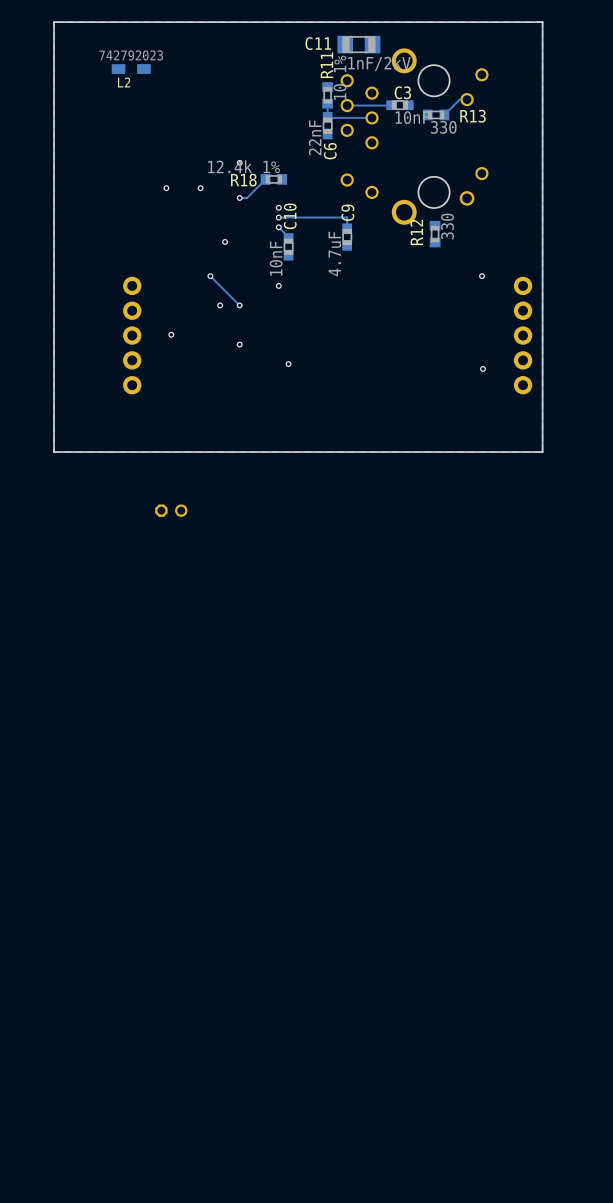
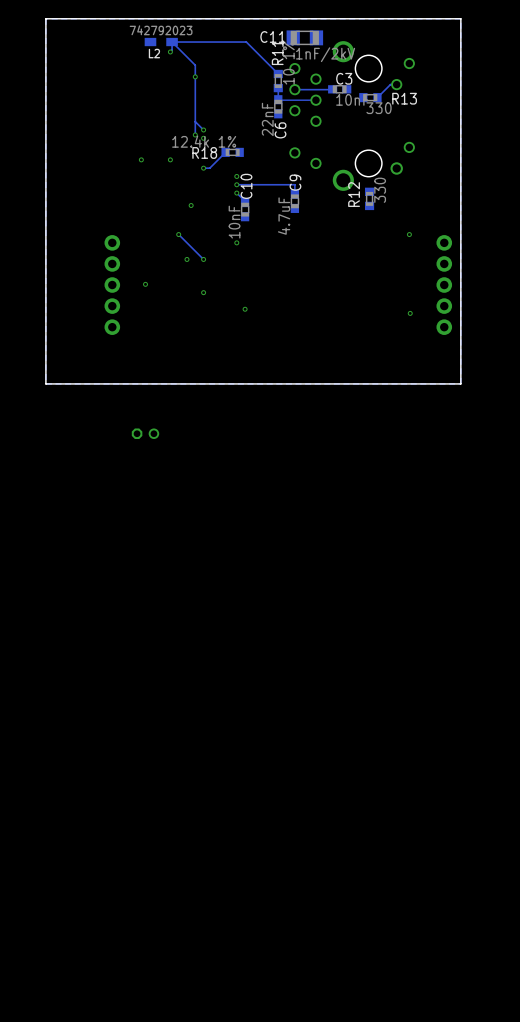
track: none -> (172, 42) (246, 42) (278, 73)
track: none -> (172, 42) (170, 51)
track: none -> (172, 42) (195, 65) (195, 134)
via: none -> (170, 51)
L2 position: (131, 69) -> (161, 42)
via: none -> (195, 76)
track: none -> (195, 121) (203, 129)
via: none -> (203, 129)
via: none -> (195, 134)

